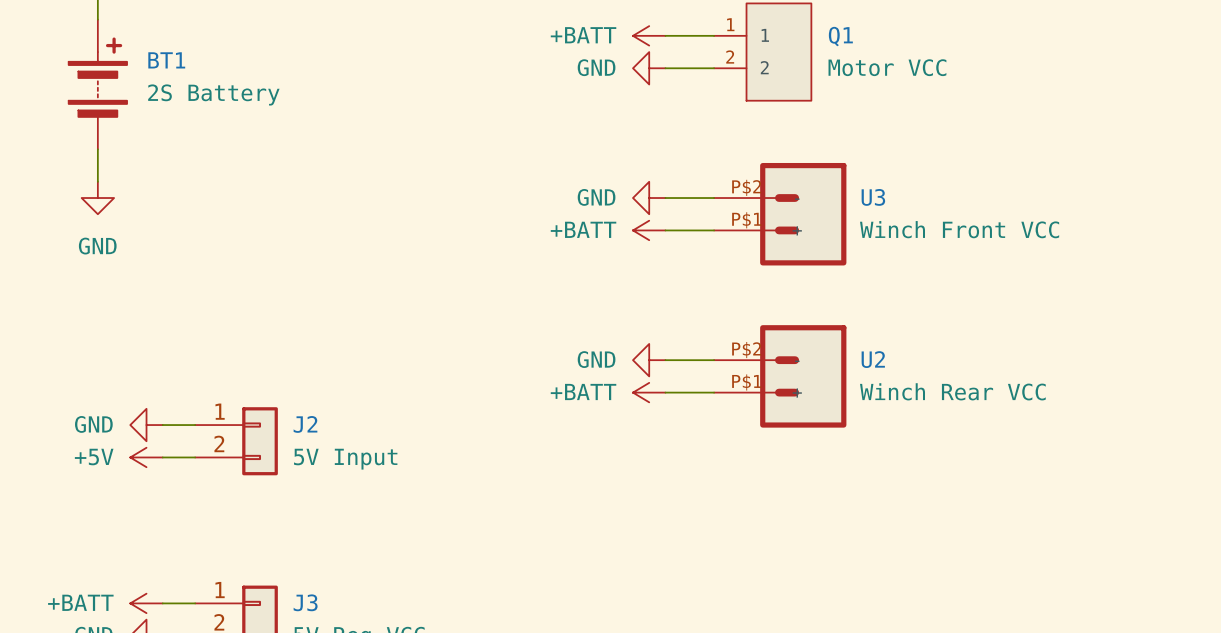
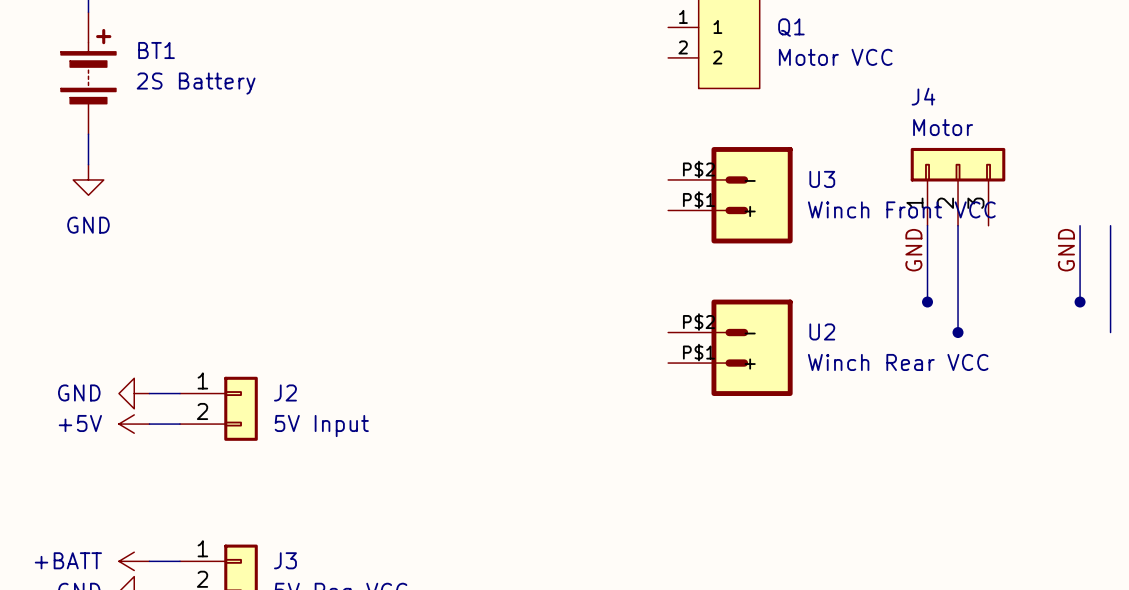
power symbol: +BATT (649, 35) -> none
wire: (665, 35) (714, 35) -> none
power symbol: GND (649, 68) -> none
wire: (665, 68) (714, 68) -> none
power symbol: GND (649, 198) -> none
wire: (665, 198) (714, 198) -> none
J4: none -> Motor (958, 186)
power symbol: +BATT (649, 230) -> none
wire: (665, 230) (714, 230) -> none
wire: none -> (927, 225) (927, 302)
wire: none -> (958, 225) (958, 332)
wire: none -> (1080, 225) (1080, 302)
wire: none -> (1110, 225) (1110, 332)
label: none -> GND (913, 250)
label: none -> GND (1066, 250)
junction: none -> (927, 302)
junction: none -> (1080, 302)
power symbol: GND (649, 360) -> none
wire: (665, 360) (714, 360) -> none
junction: none -> (958, 332)
power symbol: +BATT (649, 392) -> none
wire: (665, 392) (714, 392) -> none

